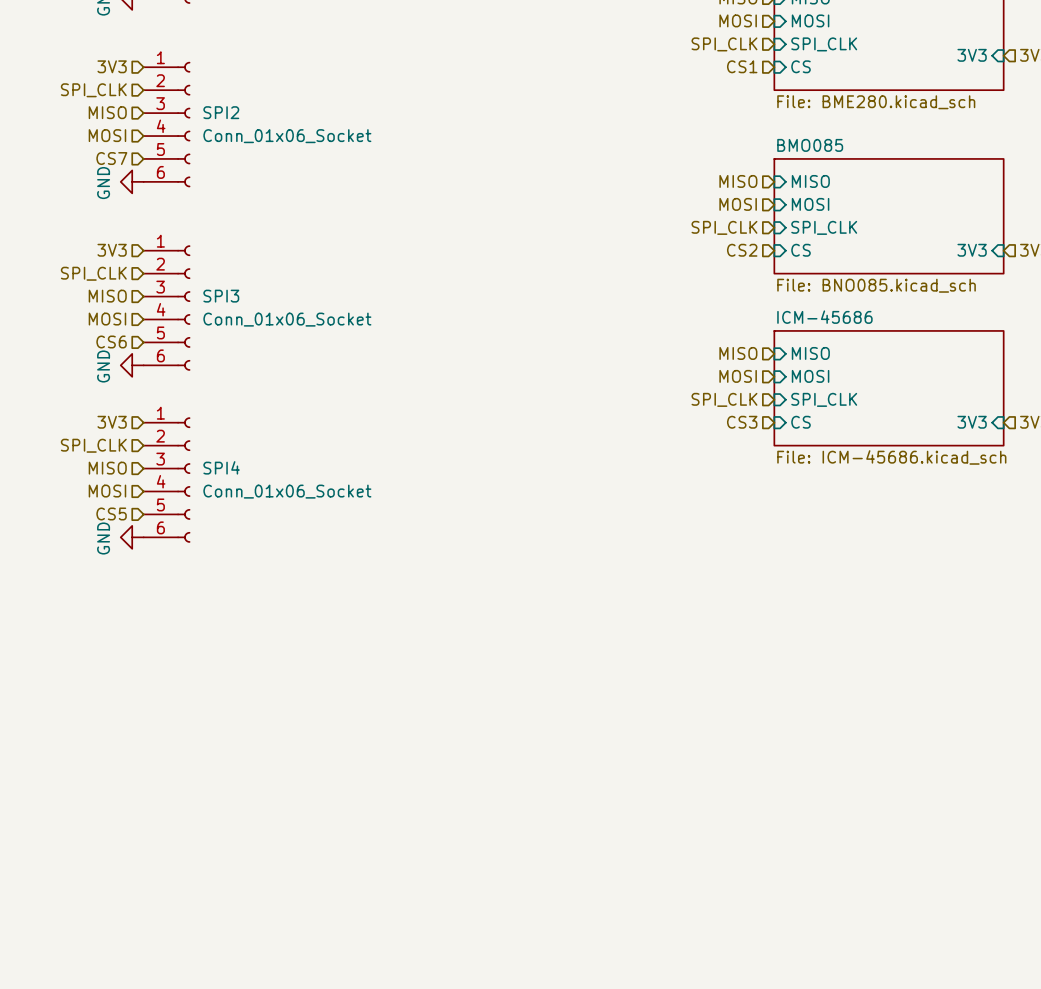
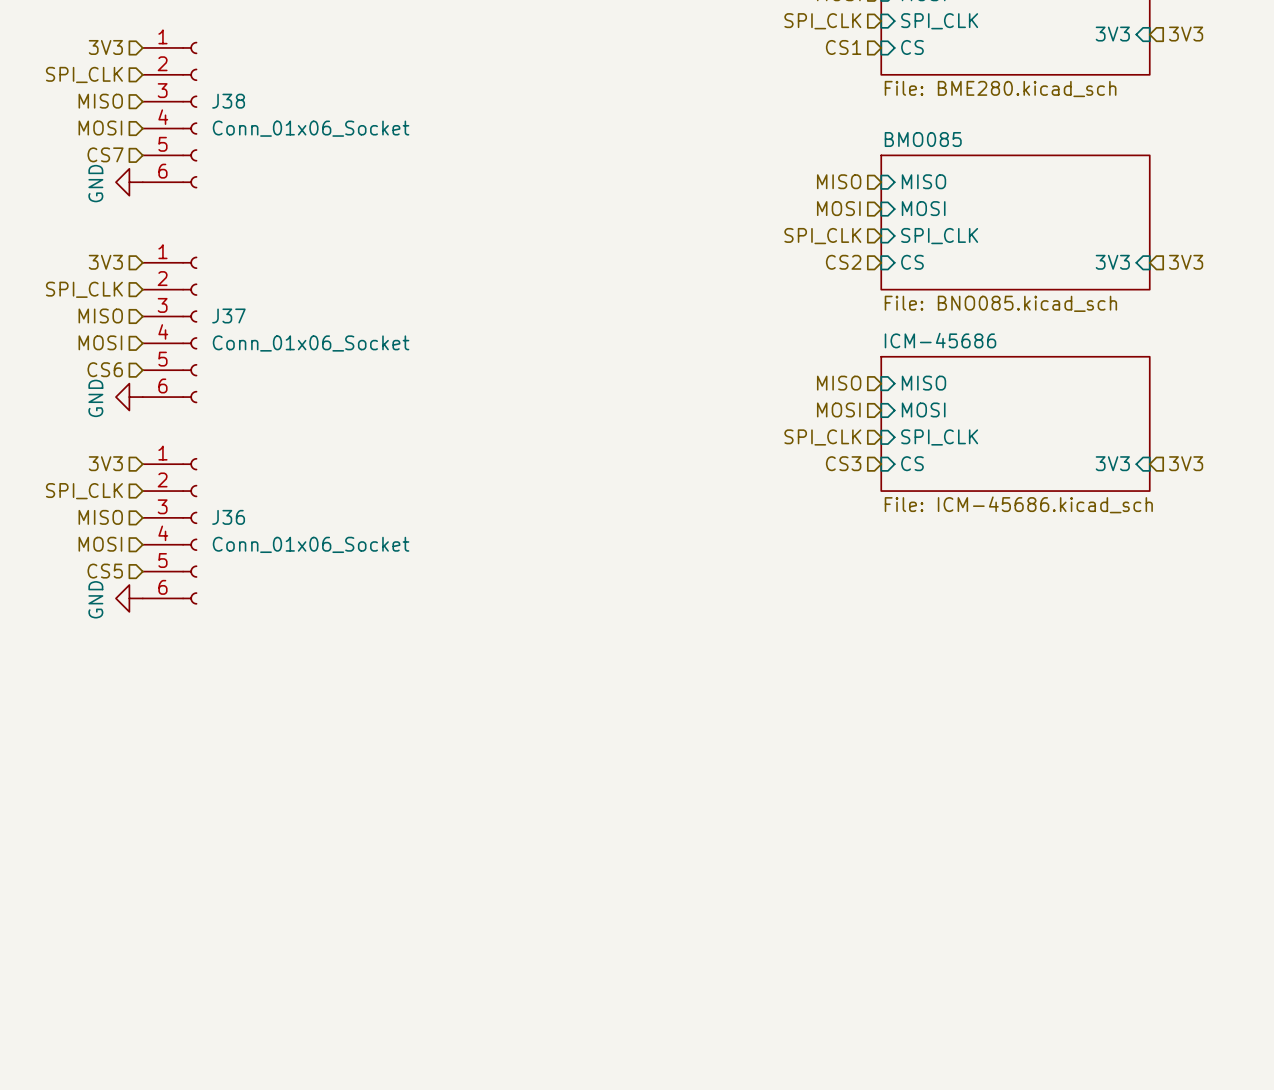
SPI2 name: SPI2 (221, 112) -> J38 (228, 101)
SPI3 name: SPI3 (221, 296) -> J37 (228, 315)
SPI4 name: SPI4 (221, 467) -> J36 (228, 517)

